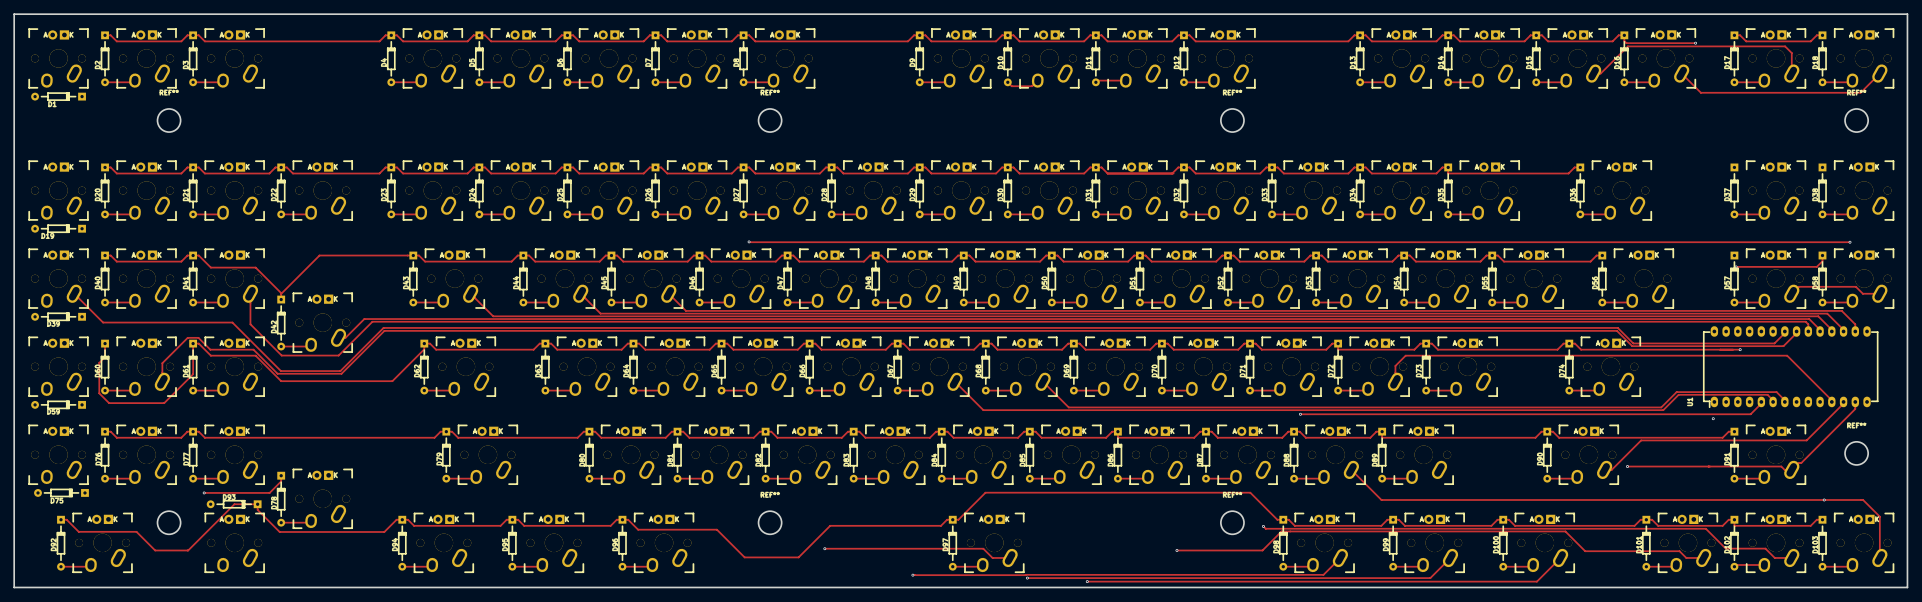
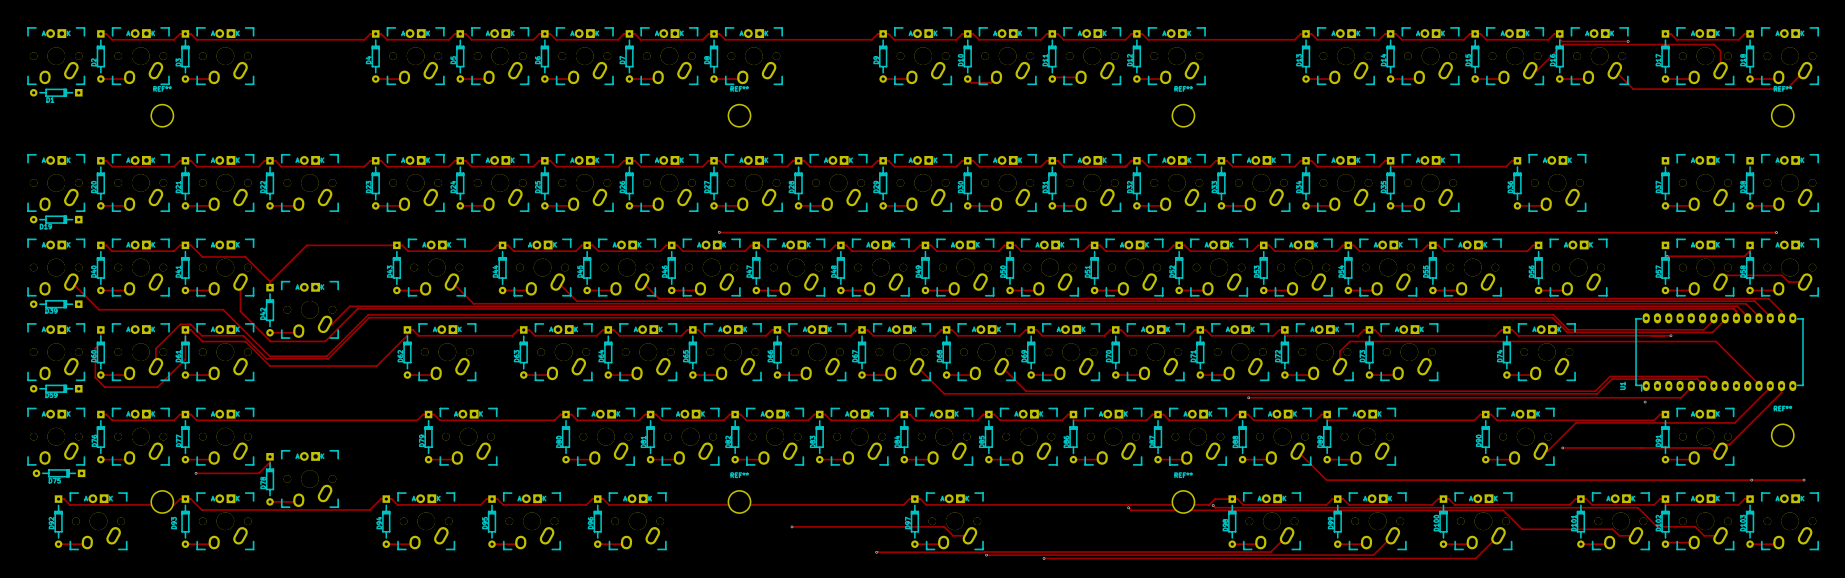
board edge: (14, 14) (1907, 14) (1907, 587) (14, 587) (14, 14) -> none
track: (1863, 499) (1879, 516) (1879, 557) -> (1789, 480) (1804, 480)
via: none -> (1804, 480)
part rotation: 0° (234, 504) -> 90° counterclockwise (185, 521)
part position: (234, 504) -> (185, 521)
track: (958, 519) (985, 492) (1250, 492) (1277, 519) -> (920, 499) (926, 504) (1209, 504) (1215, 499) (1226, 499)
track: (72, 525) (78, 531) (136, 531) (155, 550) (188, 550) (234, 504) (257, 504) (257, 509) (279, 531) (385, 531) -> (69, 504) (174, 504) (179, 499) (190, 499) (201, 510) (369, 510)
track: (634, 525) (638, 529) (716, 529) (744, 557) (798, 557) (830, 525) -> (609, 504) (797, 504)
track: (1281, 531) (1262, 550) (1176, 550) -> (1230, 510) (1131, 510) (1128, 507)
via position: (1176, 550) -> (1128, 507)
track: none -> (185, 544) (212, 544)

